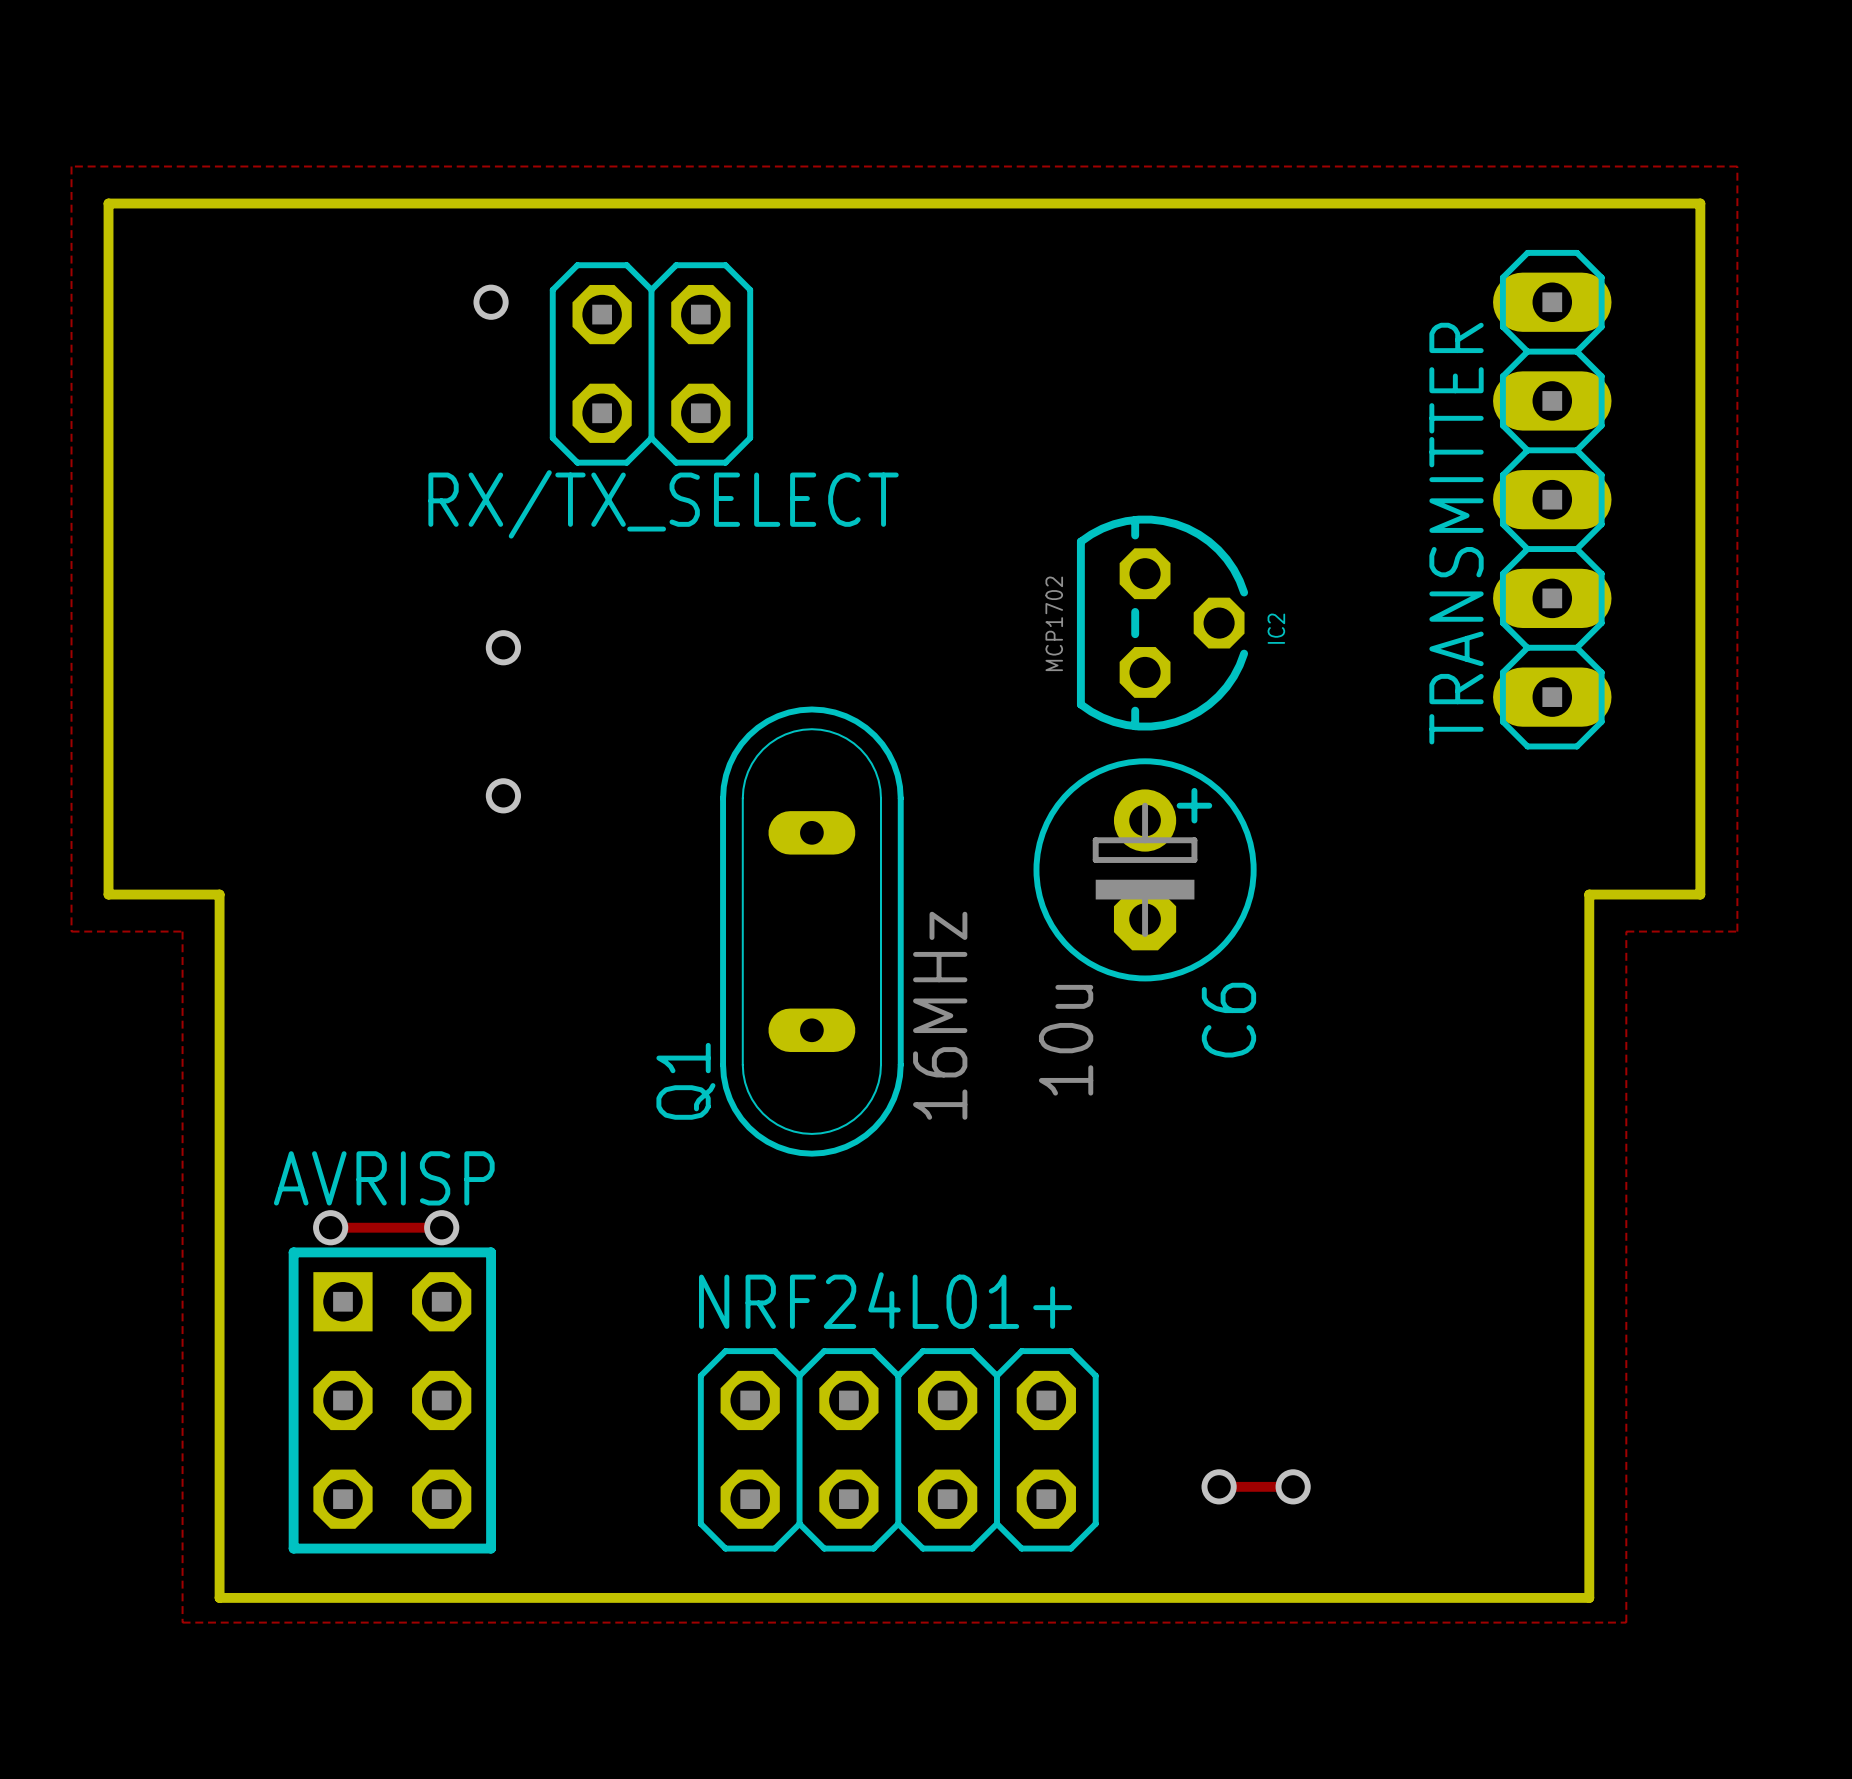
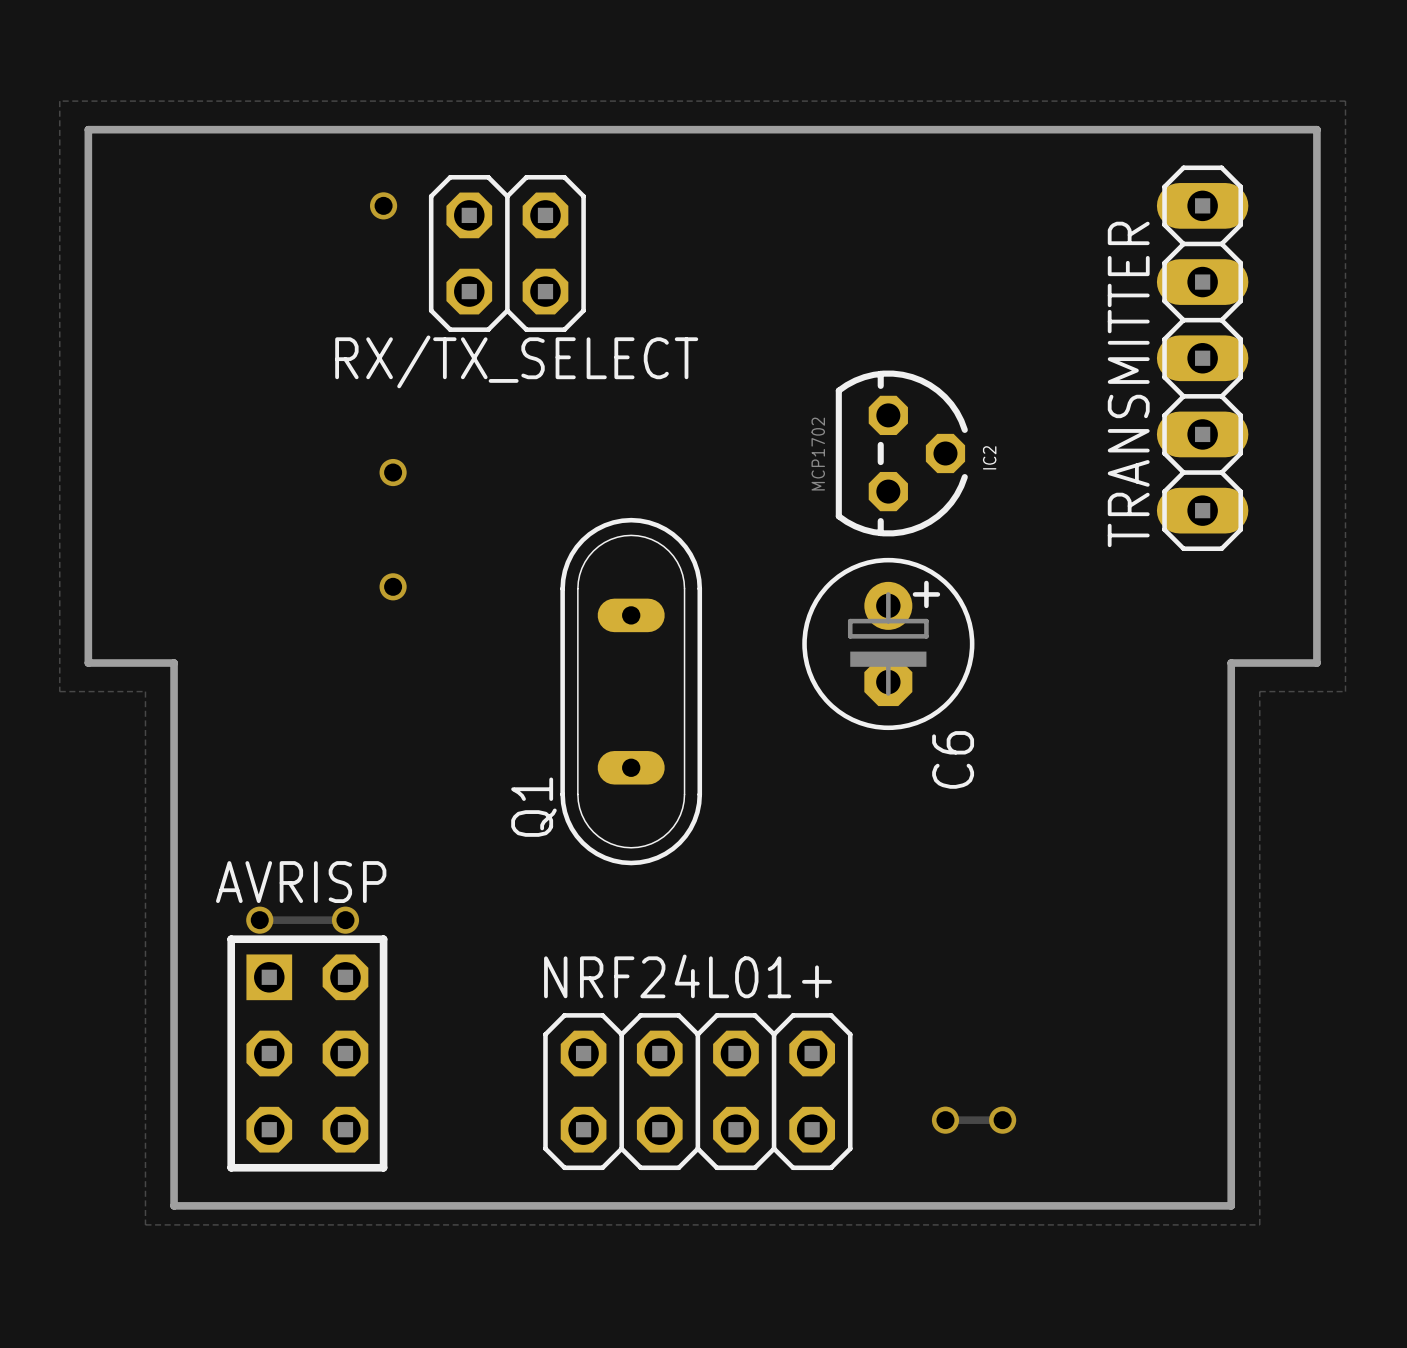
Q1 value: 16MHz (940, 1015) -> none
C6 value: 10u (1066, 1040) -> none

